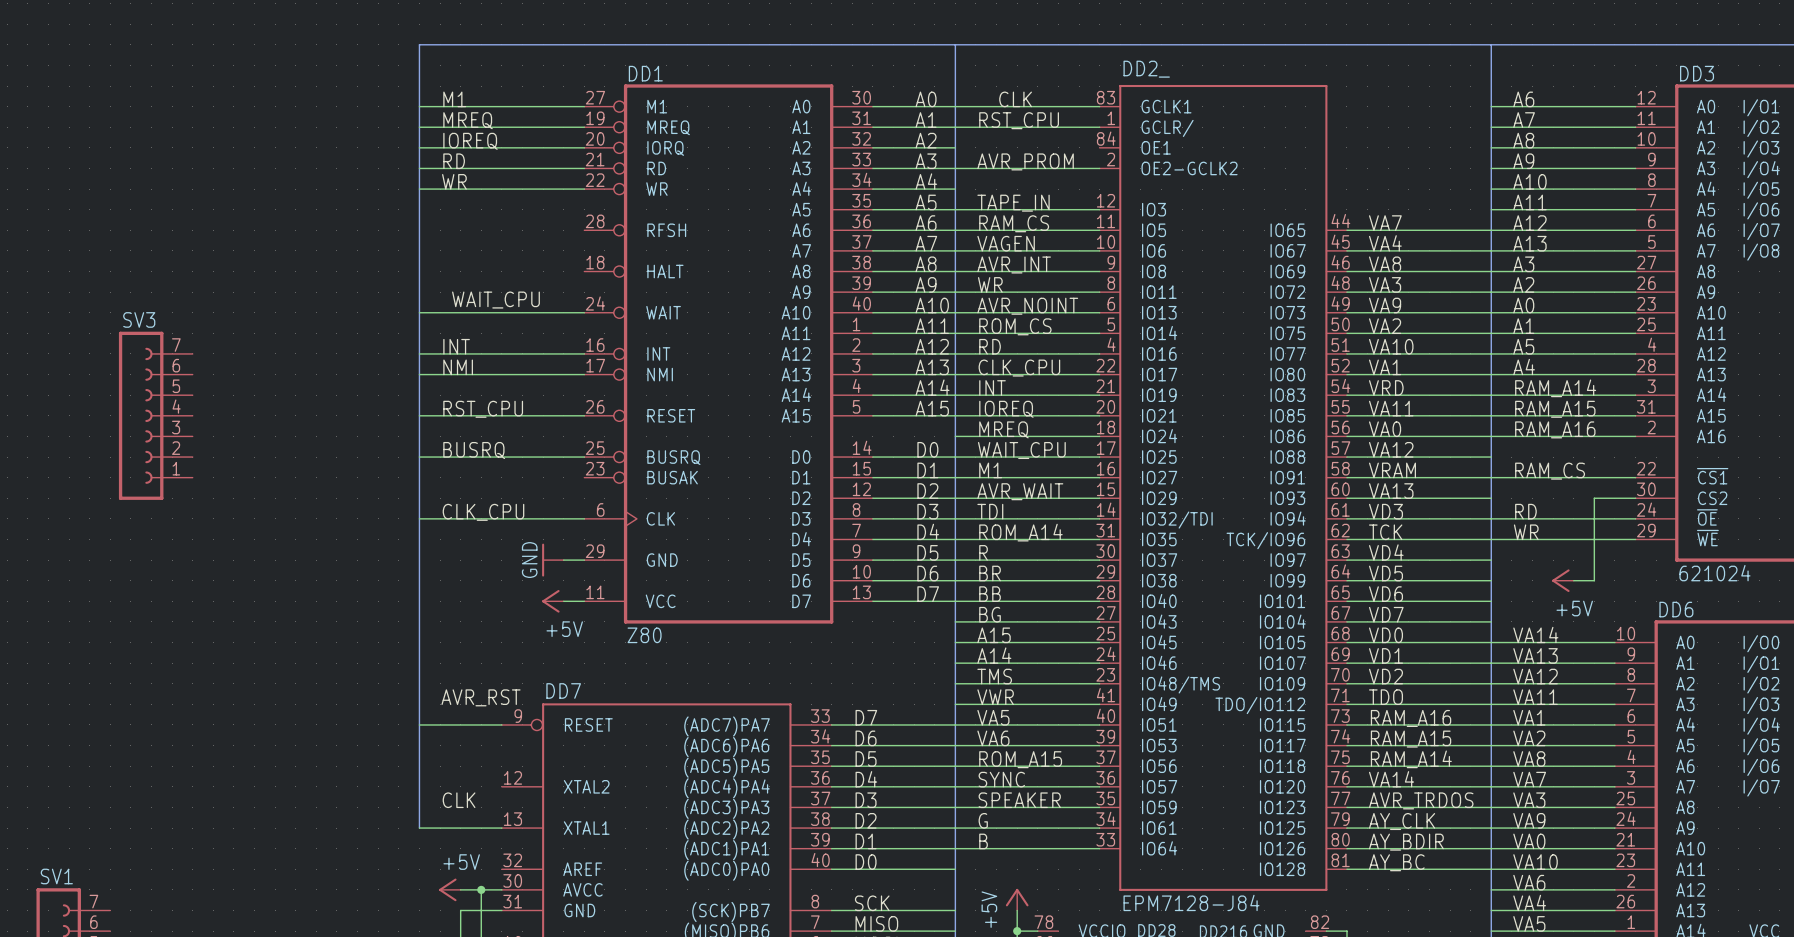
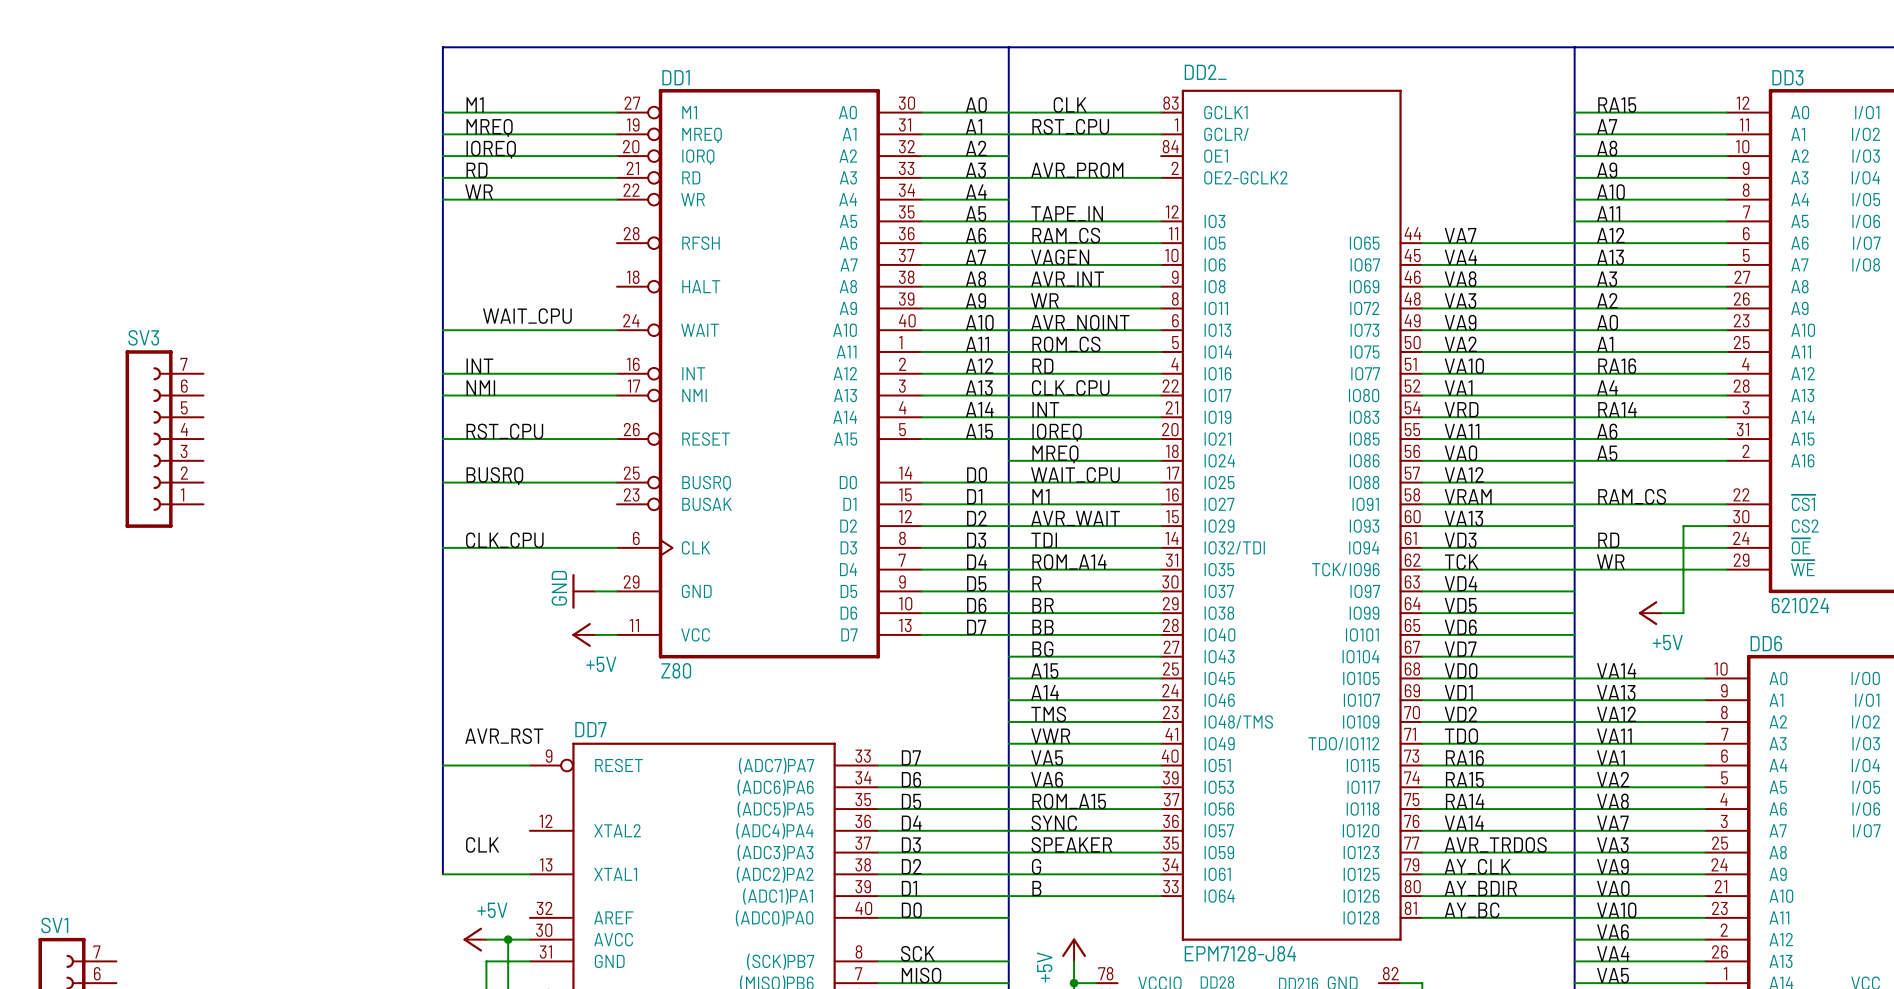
label: A6 (1523, 99) -> RA15 (1617, 105)
label: A5 (1523, 346) -> RA16 (1617, 366)
label: RAM_A14 (1555, 388) -> RA14 (1617, 409)
label: RAM_A15 (1555, 409) -> A6 (1607, 431)
label: RAM_A16 (1555, 429) -> A5 (1607, 453)
label: RAM_A16 (1411, 718) -> RA16 (1464, 757)
label: RAM_A15 (1411, 739) -> RA15 (1464, 779)
label: RAM_A14 (1411, 759) -> RA14 (1465, 801)

